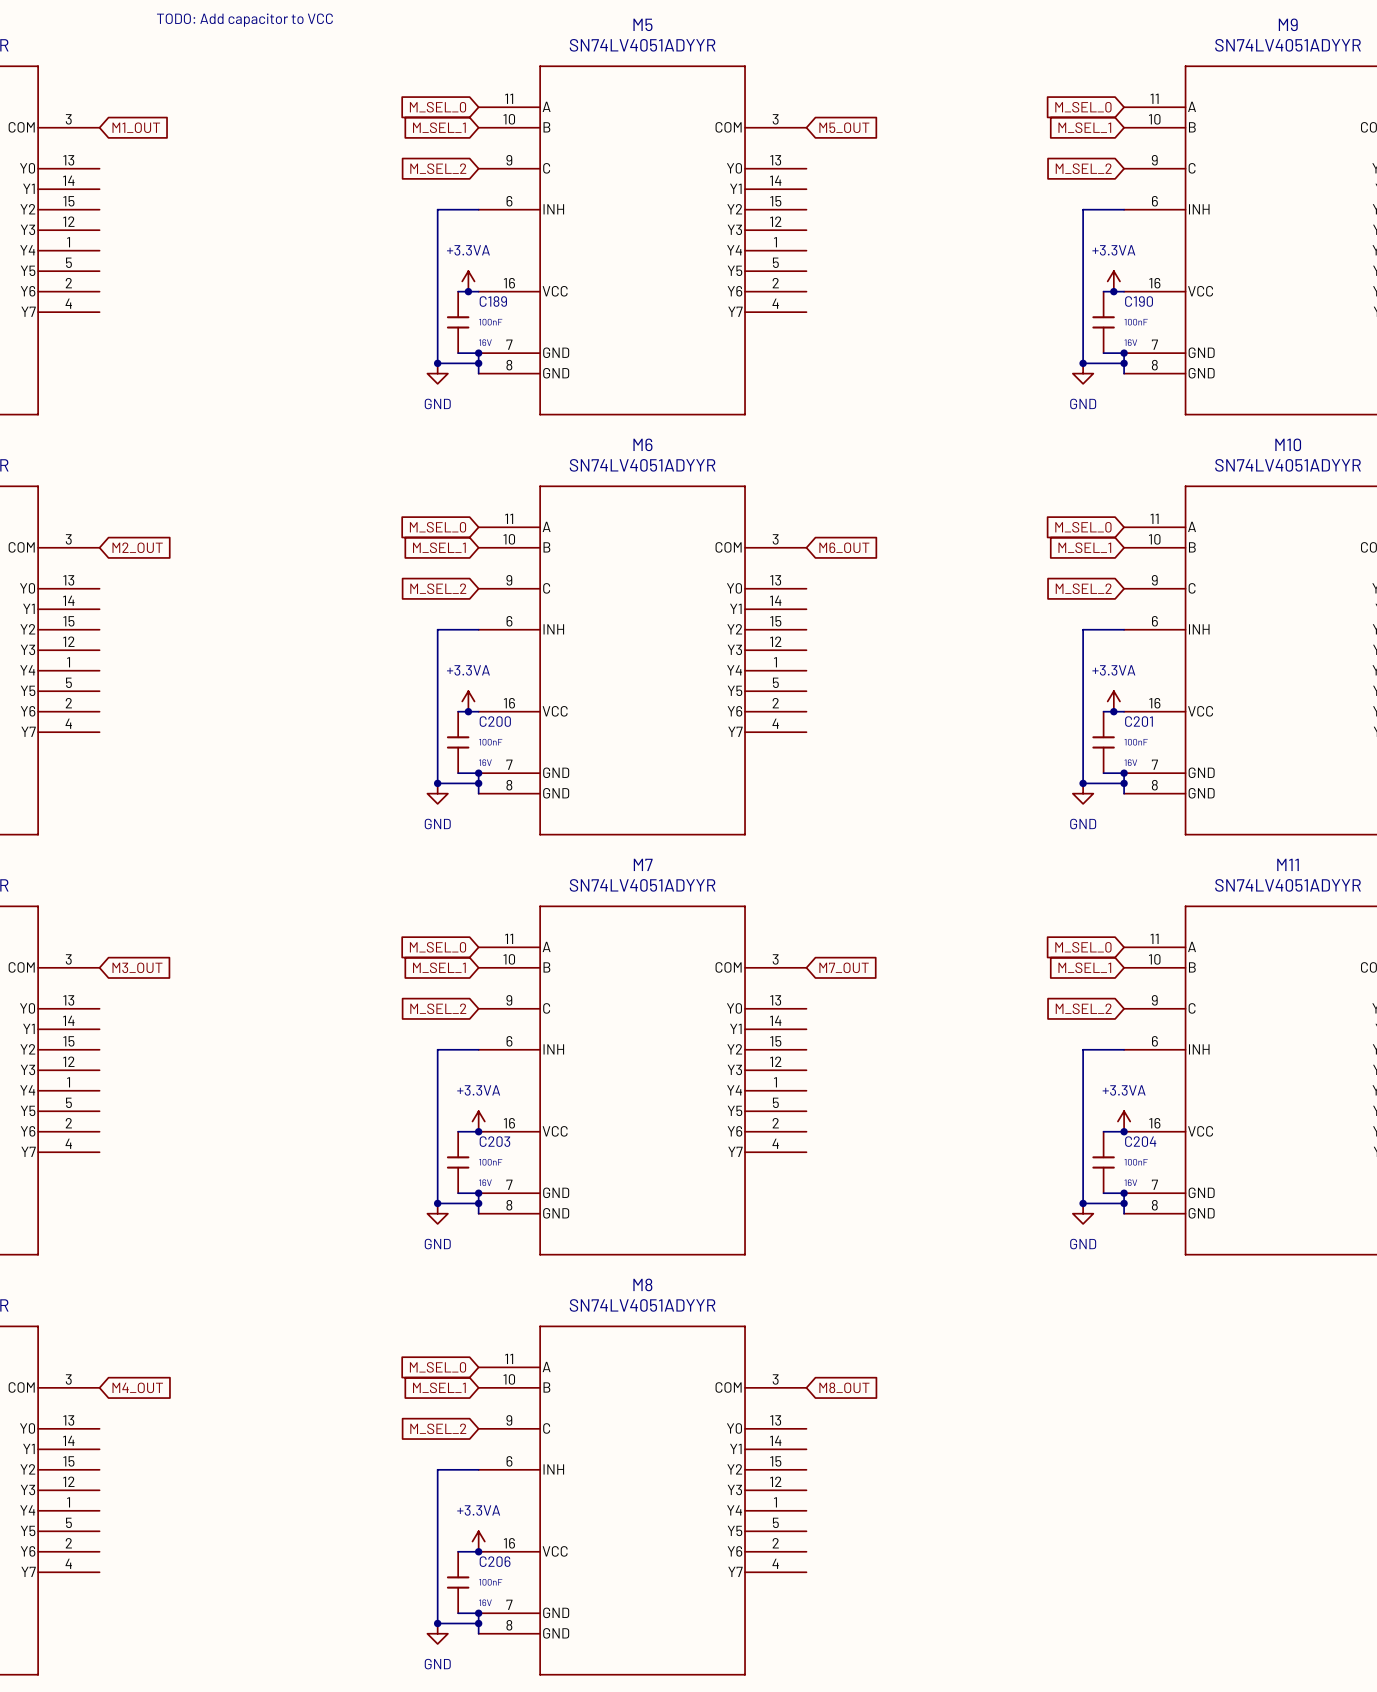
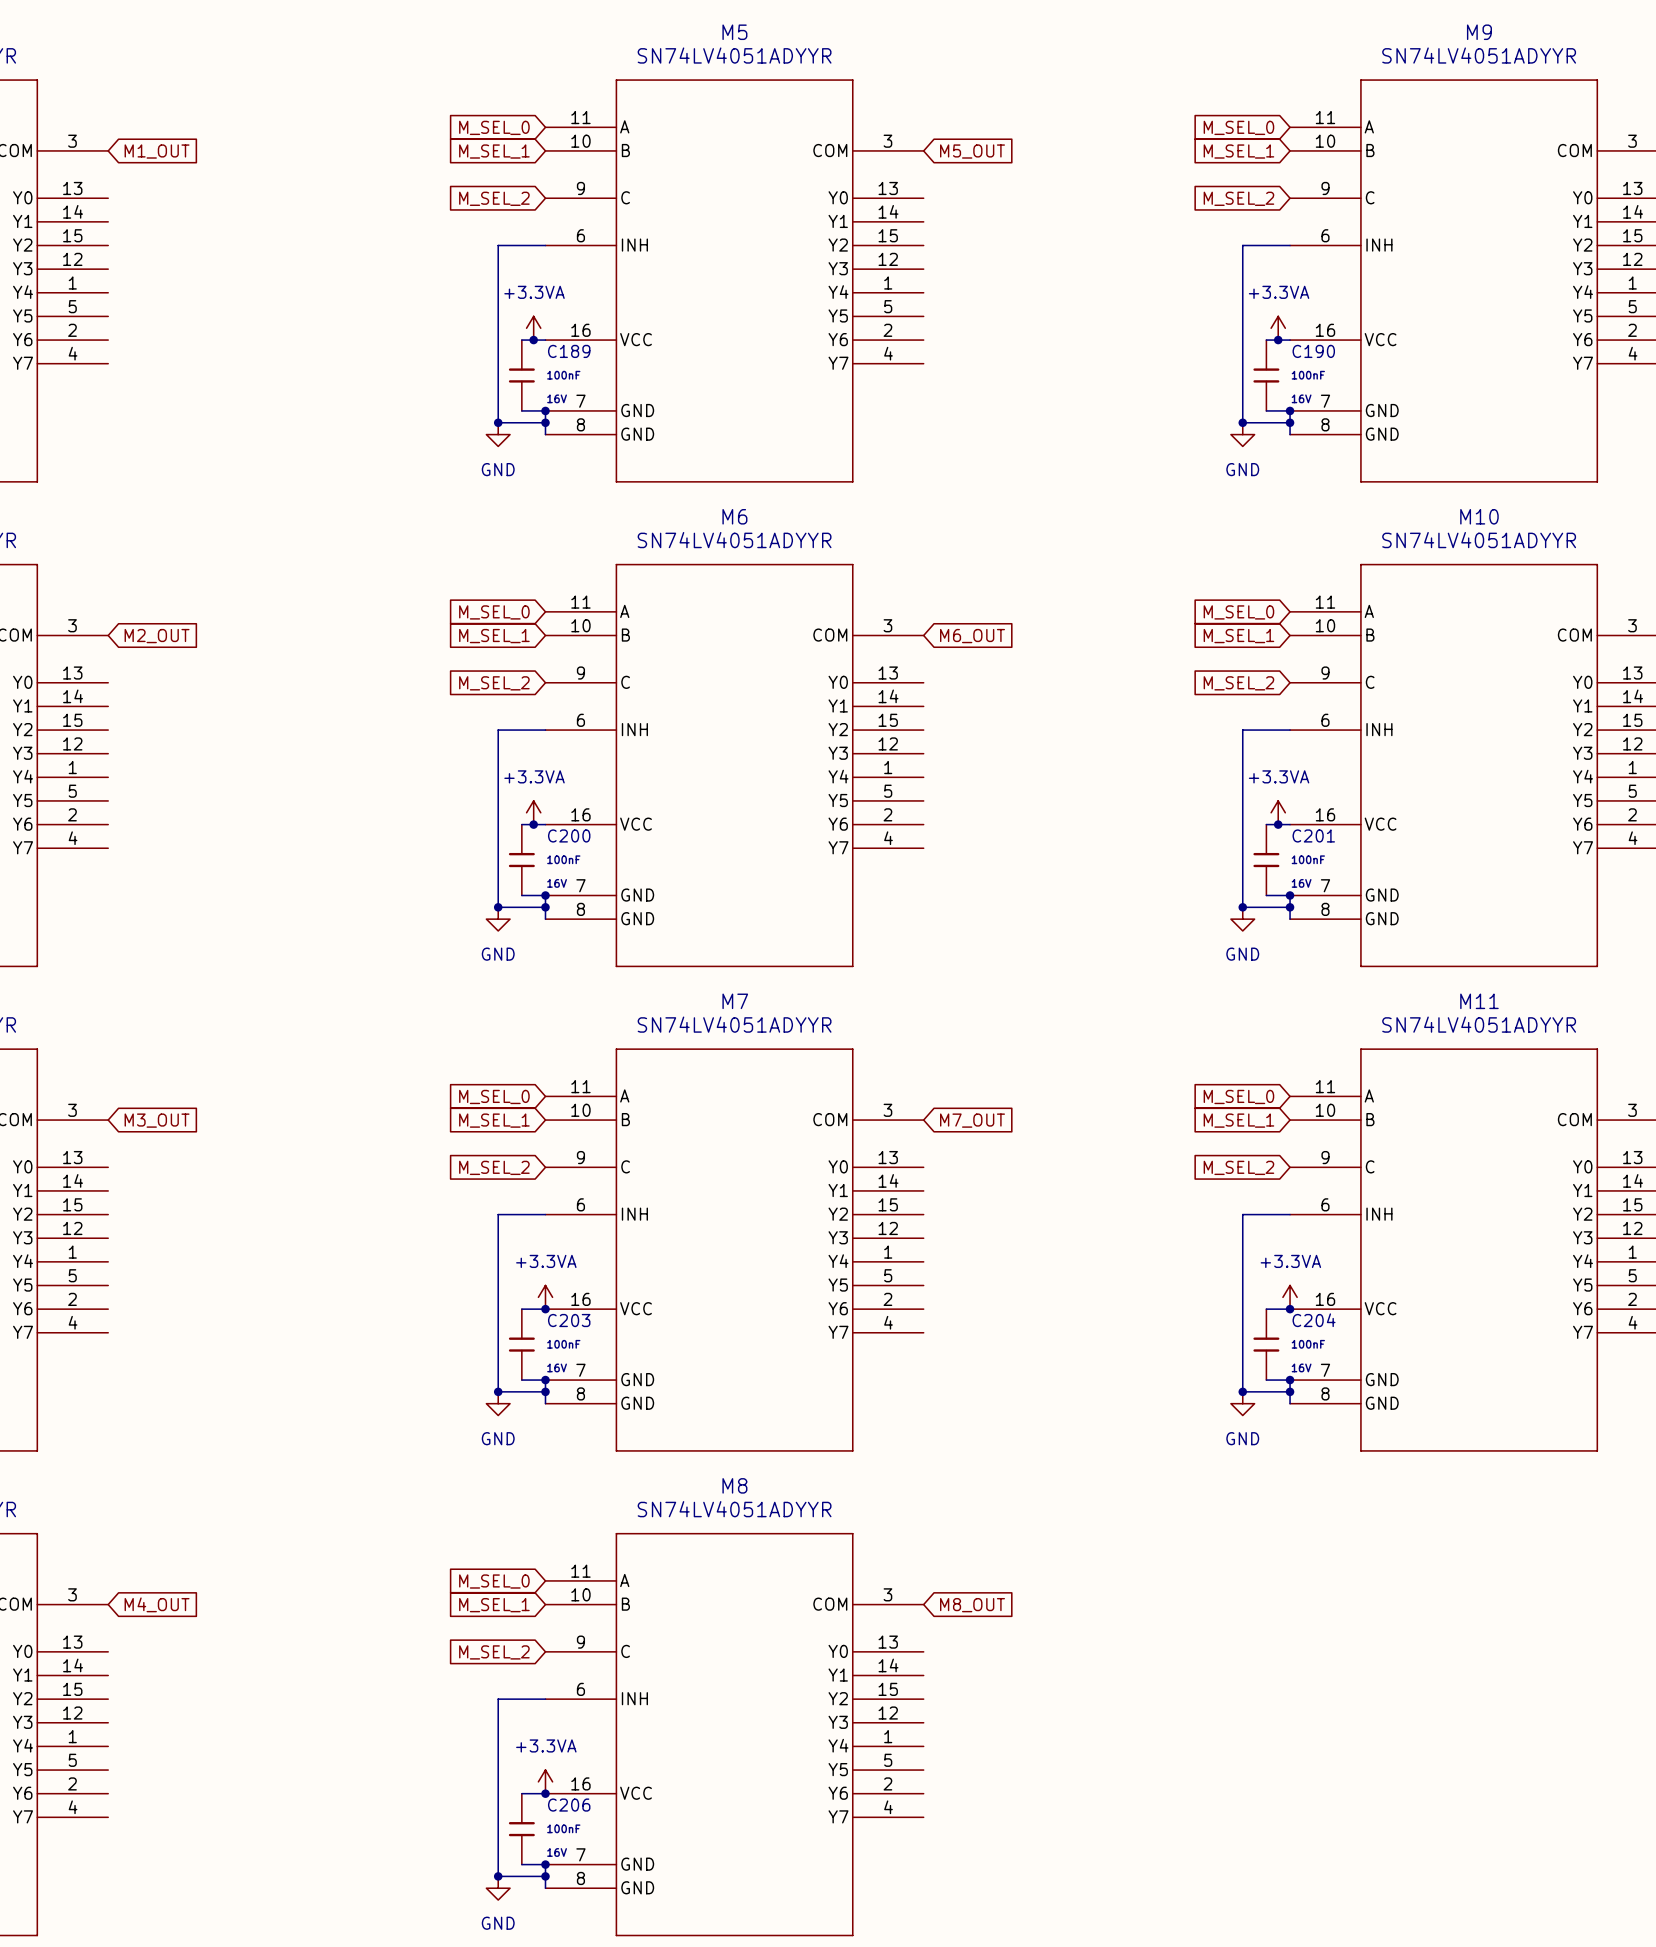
text: TODO: Add capacitor to VCC (244, 20) -> none

